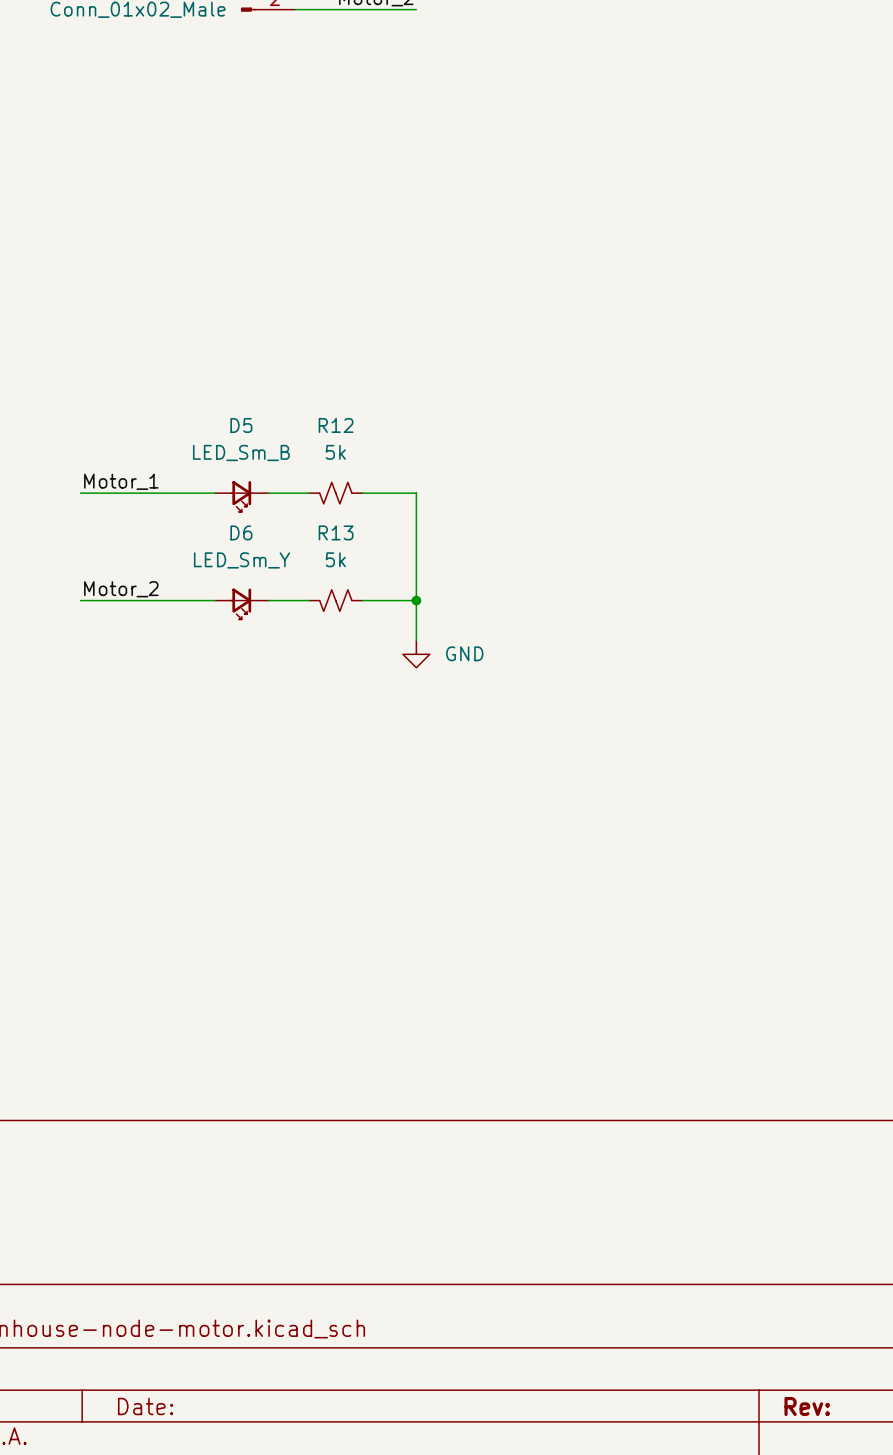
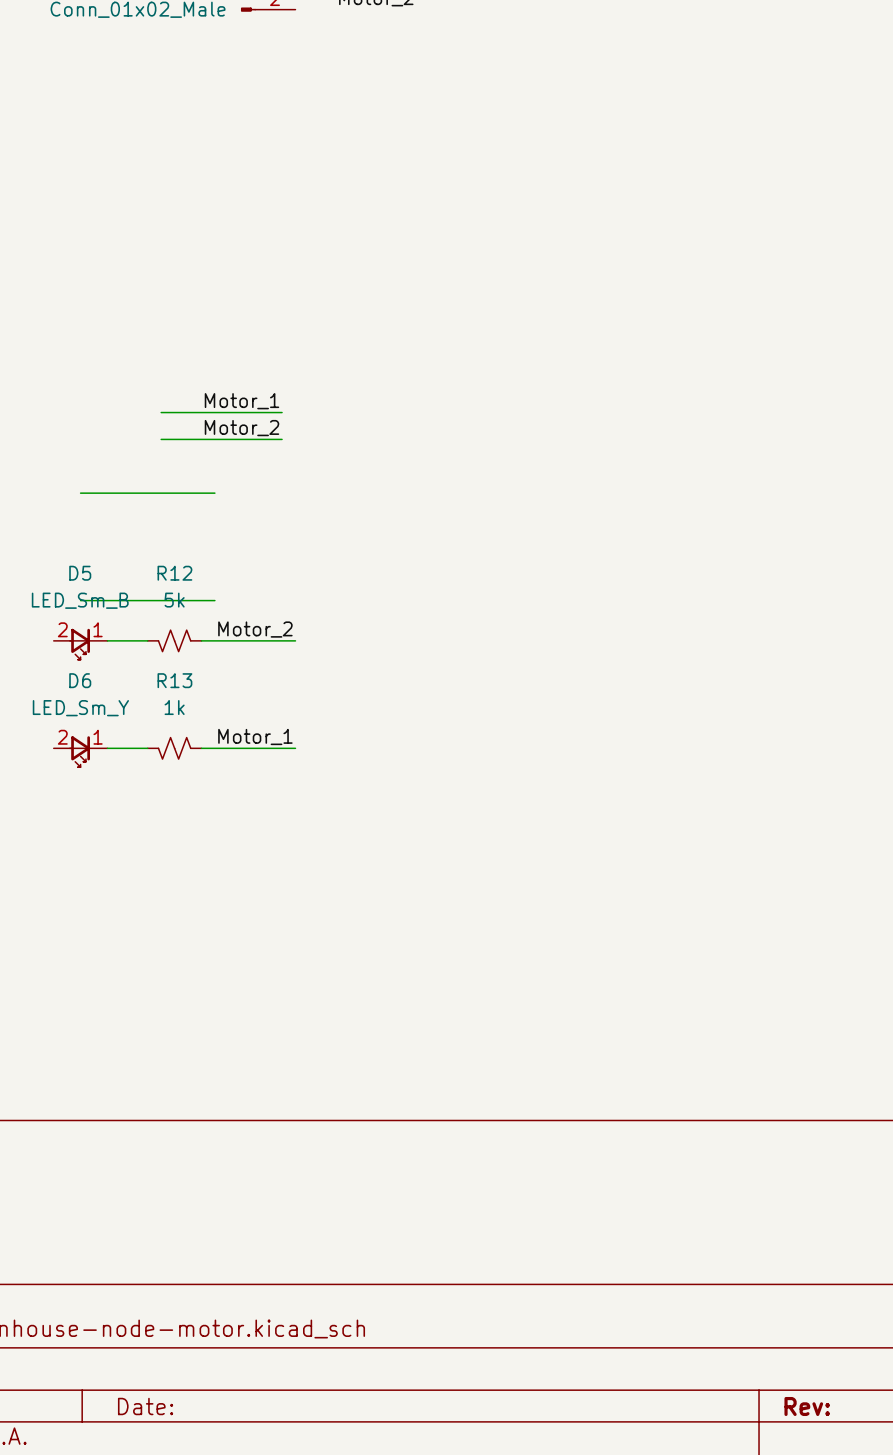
wire: (295, 9) (416, 9) -> none
label: none -> Motor_1 (241, 401)
wire: none -> (161, 412) (282, 412)
label: none -> Motor_2 (241, 428)
wire: none -> (161, 439) (282, 439)
label: Motor_1 (121, 481) -> none
wire: (268, 493) (308, 493) -> (107, 640) (147, 640)
R12 position: (335, 493) -> (174, 640)
wire: (362, 493) (416, 493) (416, 640) -> none
D5 position: (241, 496) -> (80, 644)
R13 value: 5k (335, 559) -> 1k (174, 707)
label: Motor_2 (121, 589) -> none
wire: (268, 600) (308, 600) -> (107, 748) (147, 748)
R13 position: (335, 600) -> (174, 748)
wire: (362, 600) (416, 600) -> none
junction: (416, 600) -> none
D6 position: (241, 603) -> (80, 751)
D5 pin number: none -> 2 (62, 629)
D5 pin number: none -> 1 (98, 629)
label: none -> Motor_2 (255, 629)
wire: none -> (201, 640) (295, 640)
power symbol: GND (416, 654) -> none
label: none -> Motor_1 (255, 736)
D6 pin number: none -> 2 (62, 737)
D6 pin number: none -> 1 (98, 737)
wire: none -> (201, 748) (295, 748)

